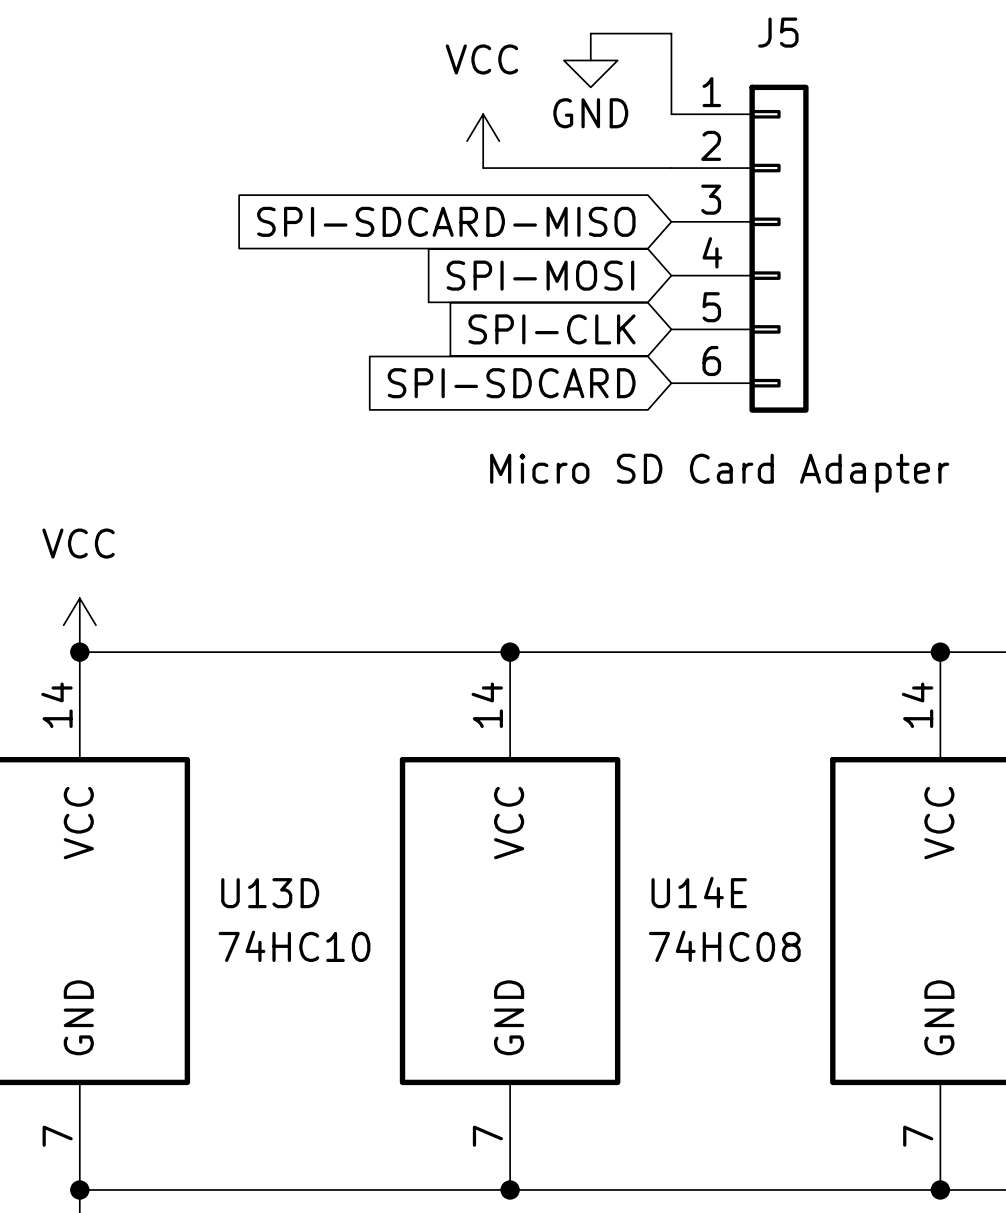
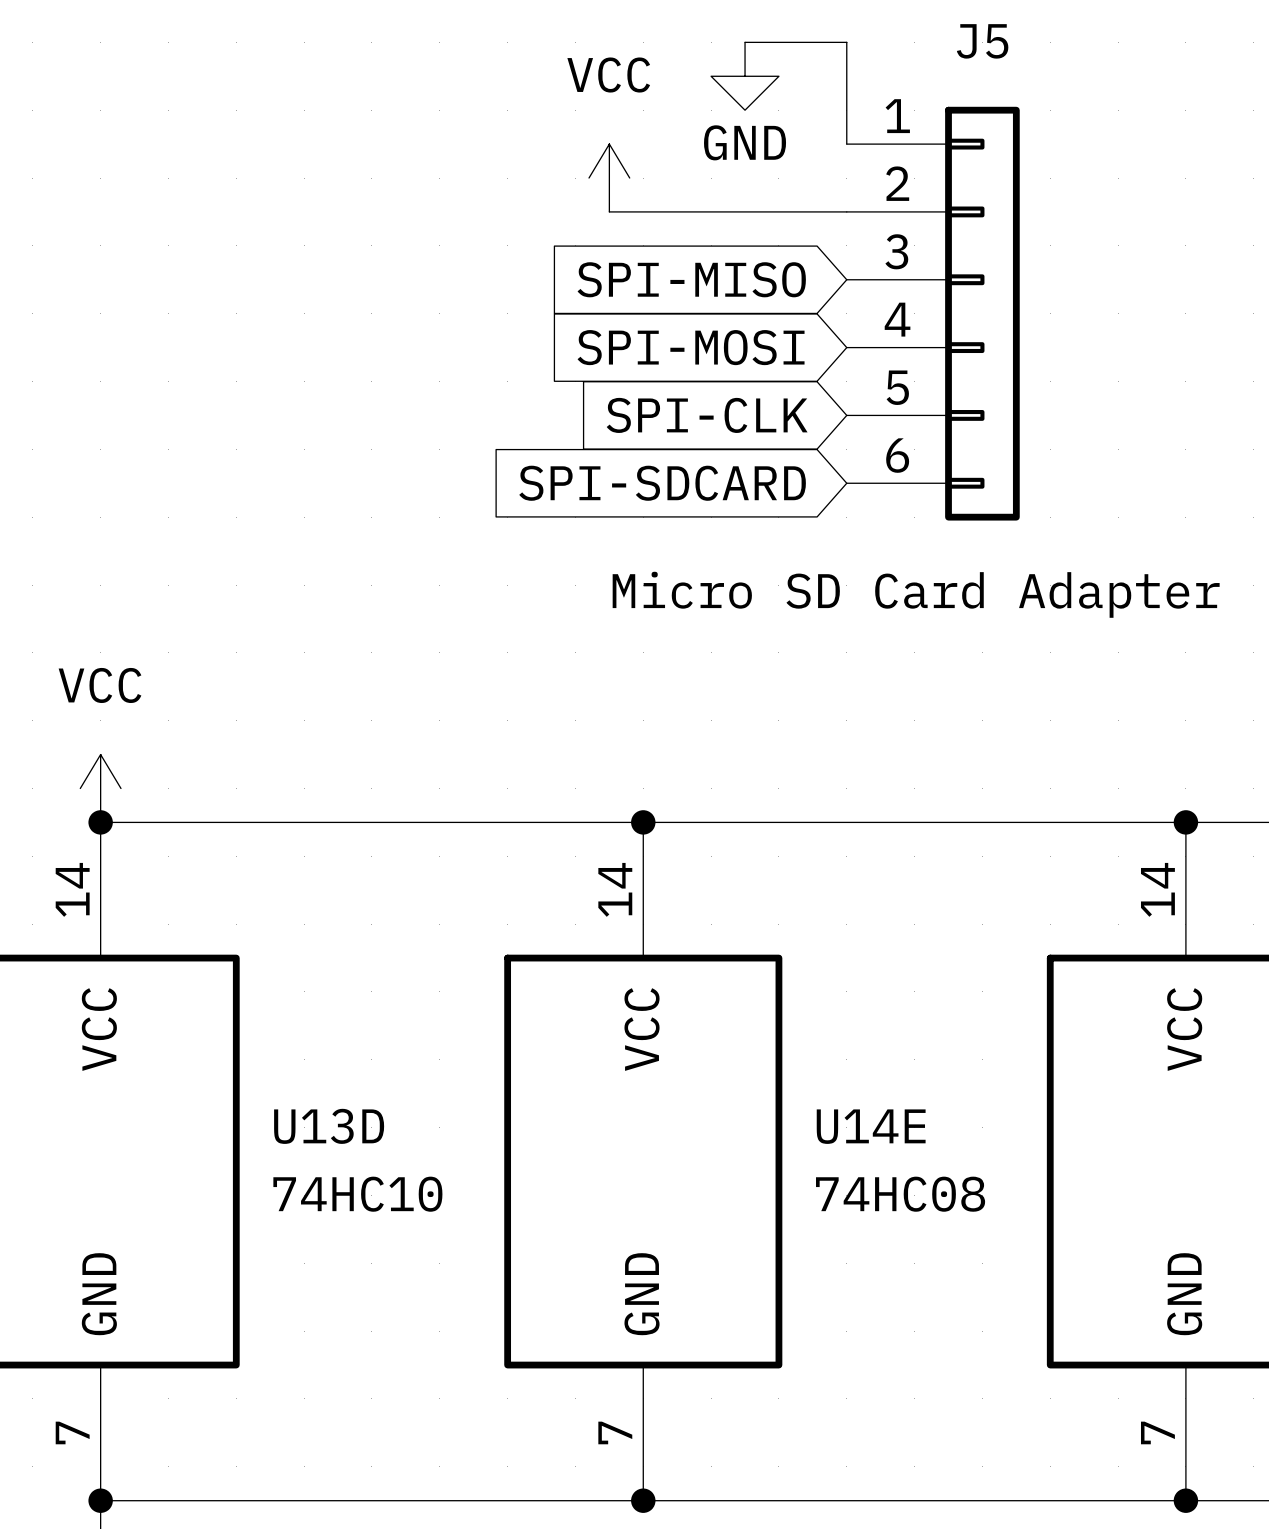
global label: SPI-SDCARD-MISO (446, 221) -> SPI-MISO (691, 279)

